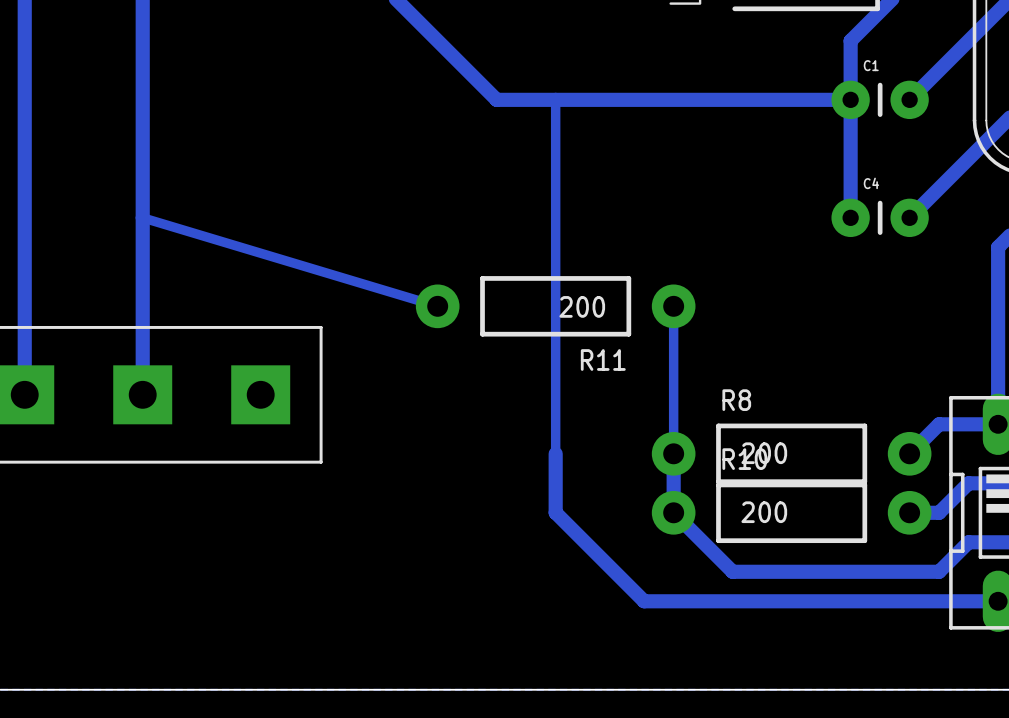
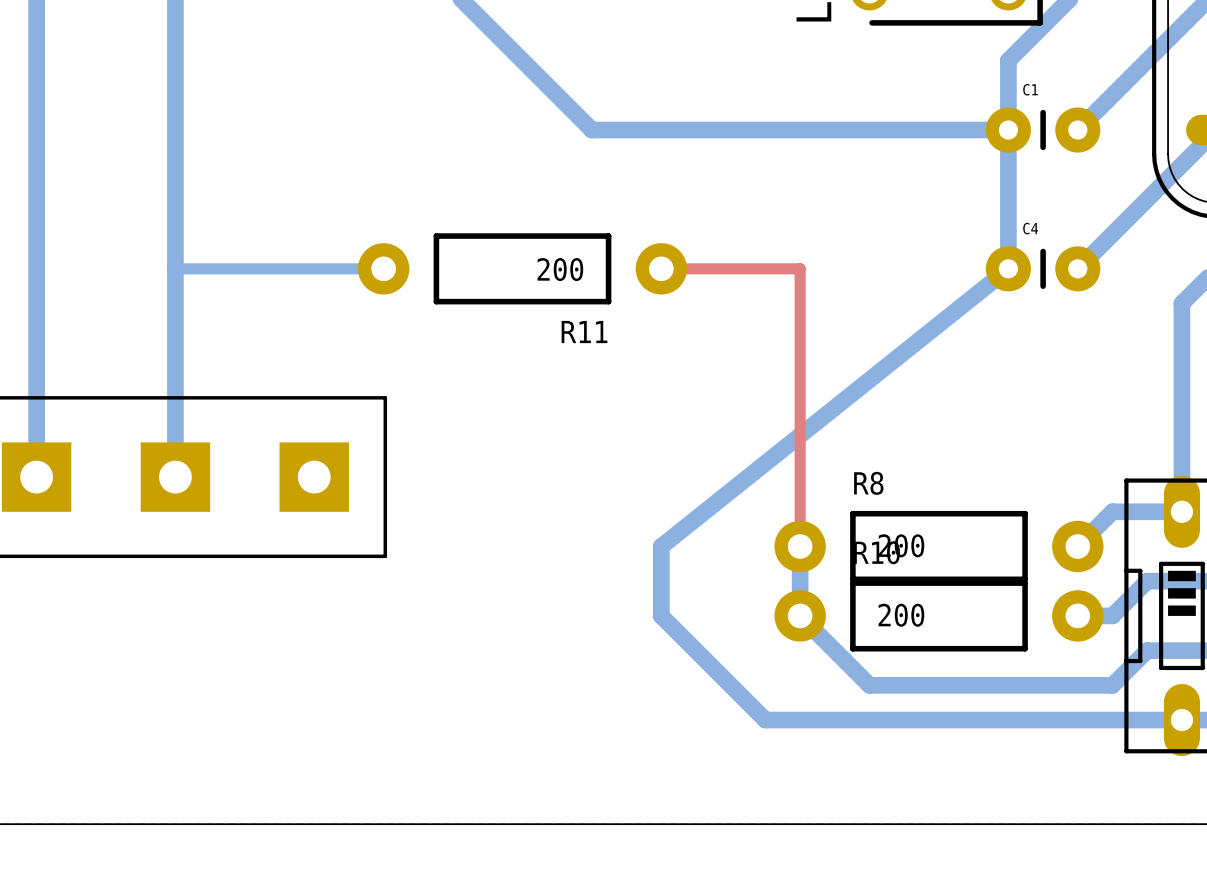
bottom track: (555, 99) (555, 453) -> (1008, 268) (661, 546)
bottom track: (142, 217) (437, 306) -> (175, 268) (383, 268)
top track: none -> (661, 268) (800, 268) (800, 546)
R11 position: (555, 306) -> (522, 268)
bottom track: (673, 306) (673, 512) -> none

